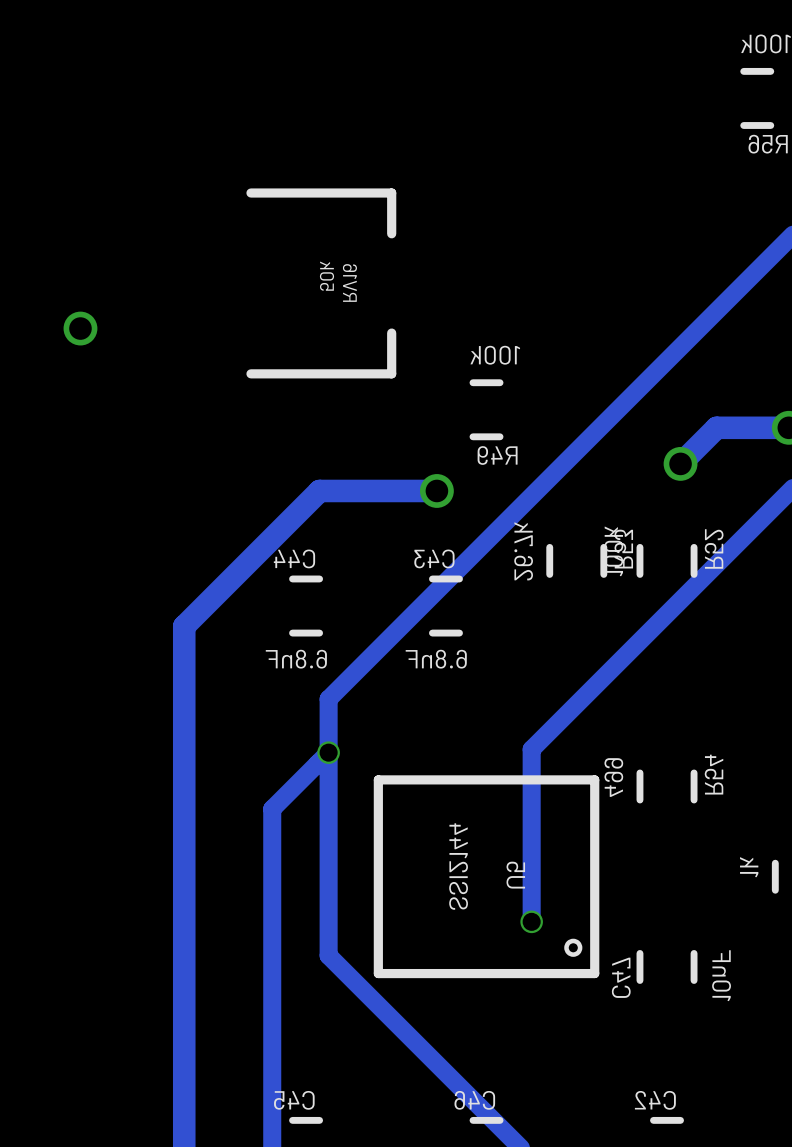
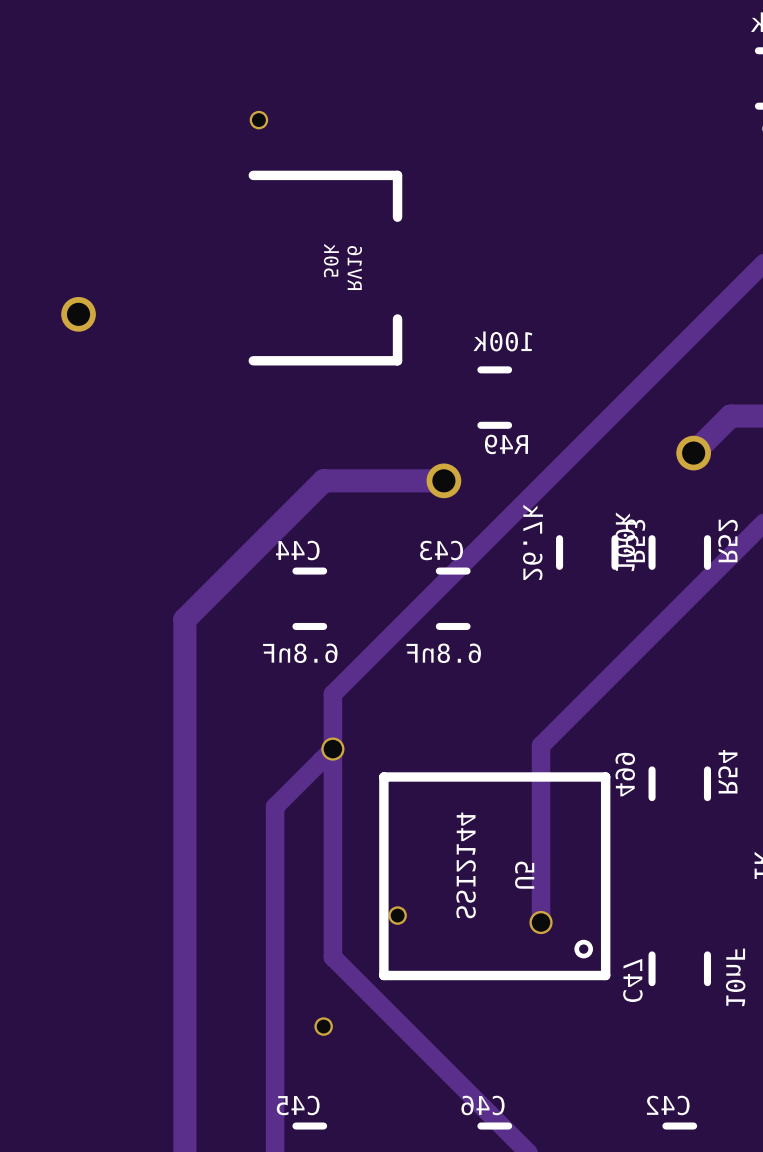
via: none -> (258, 120)
via: none -> (397, 915)
via: none -> (323, 1026)

